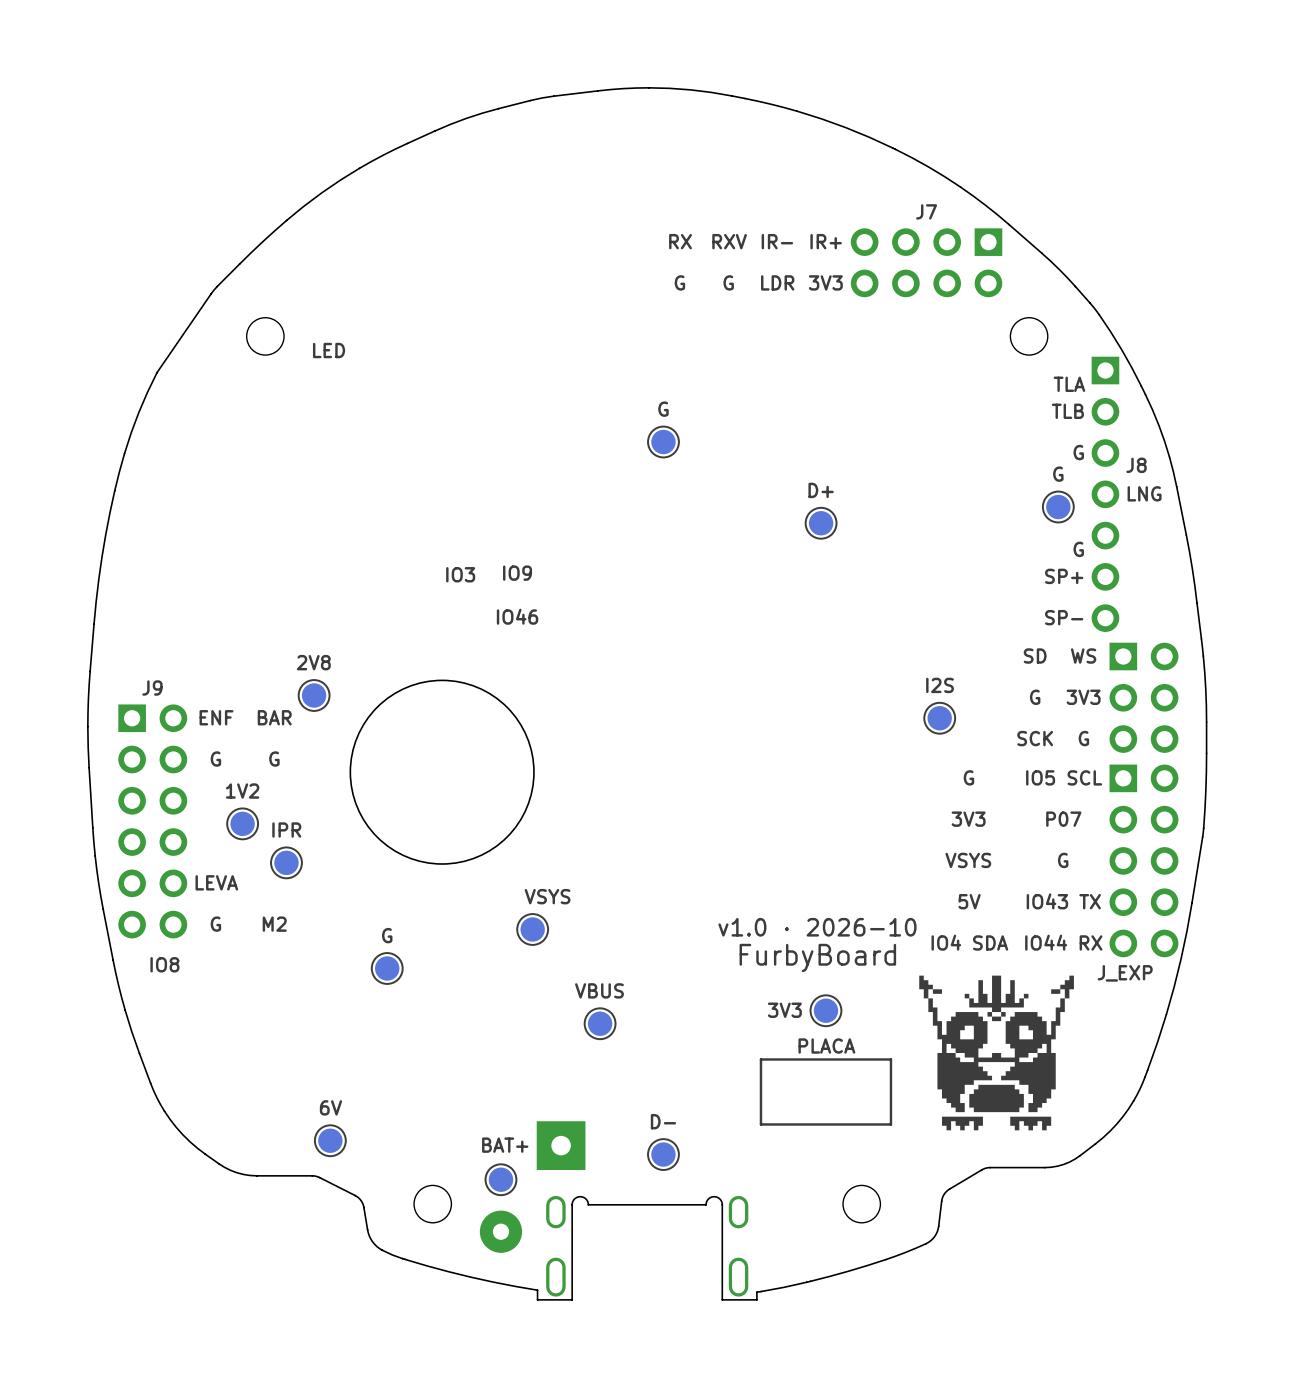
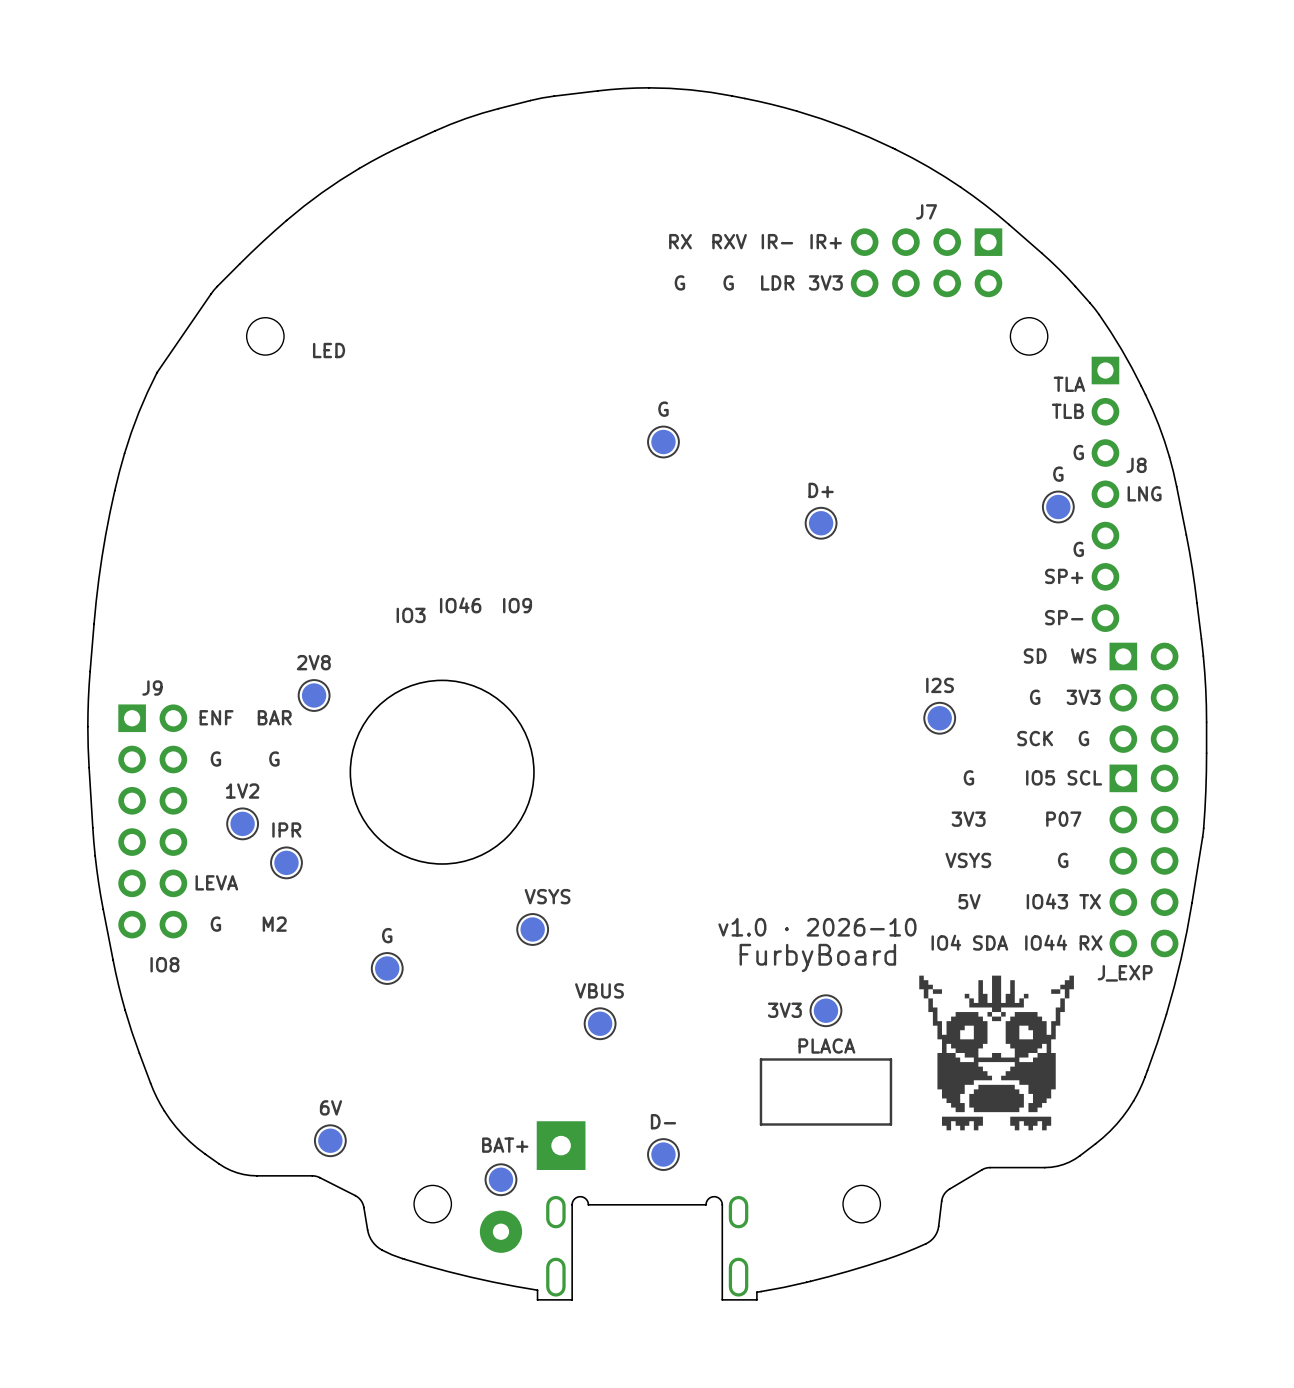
text: IO9 (517, 573) -> none
text position: IO3 (460, 574) -> IO3 (411, 615)
text: none -> IO46 (460, 605)
text: IO46 (517, 616) -> IO9 (517, 605)

